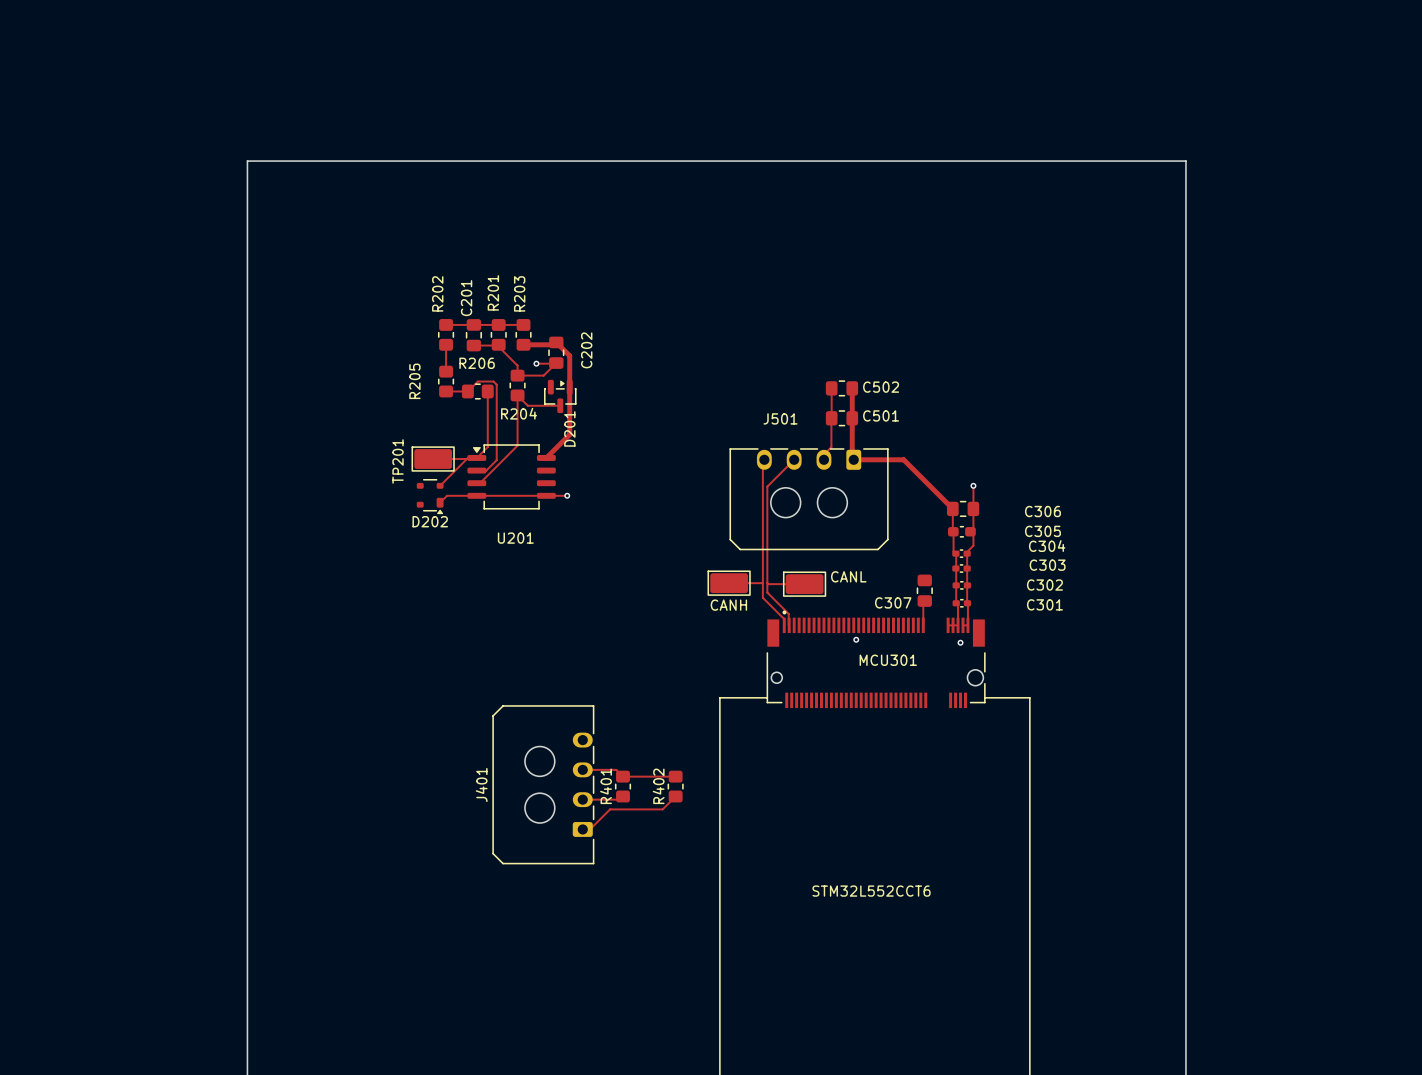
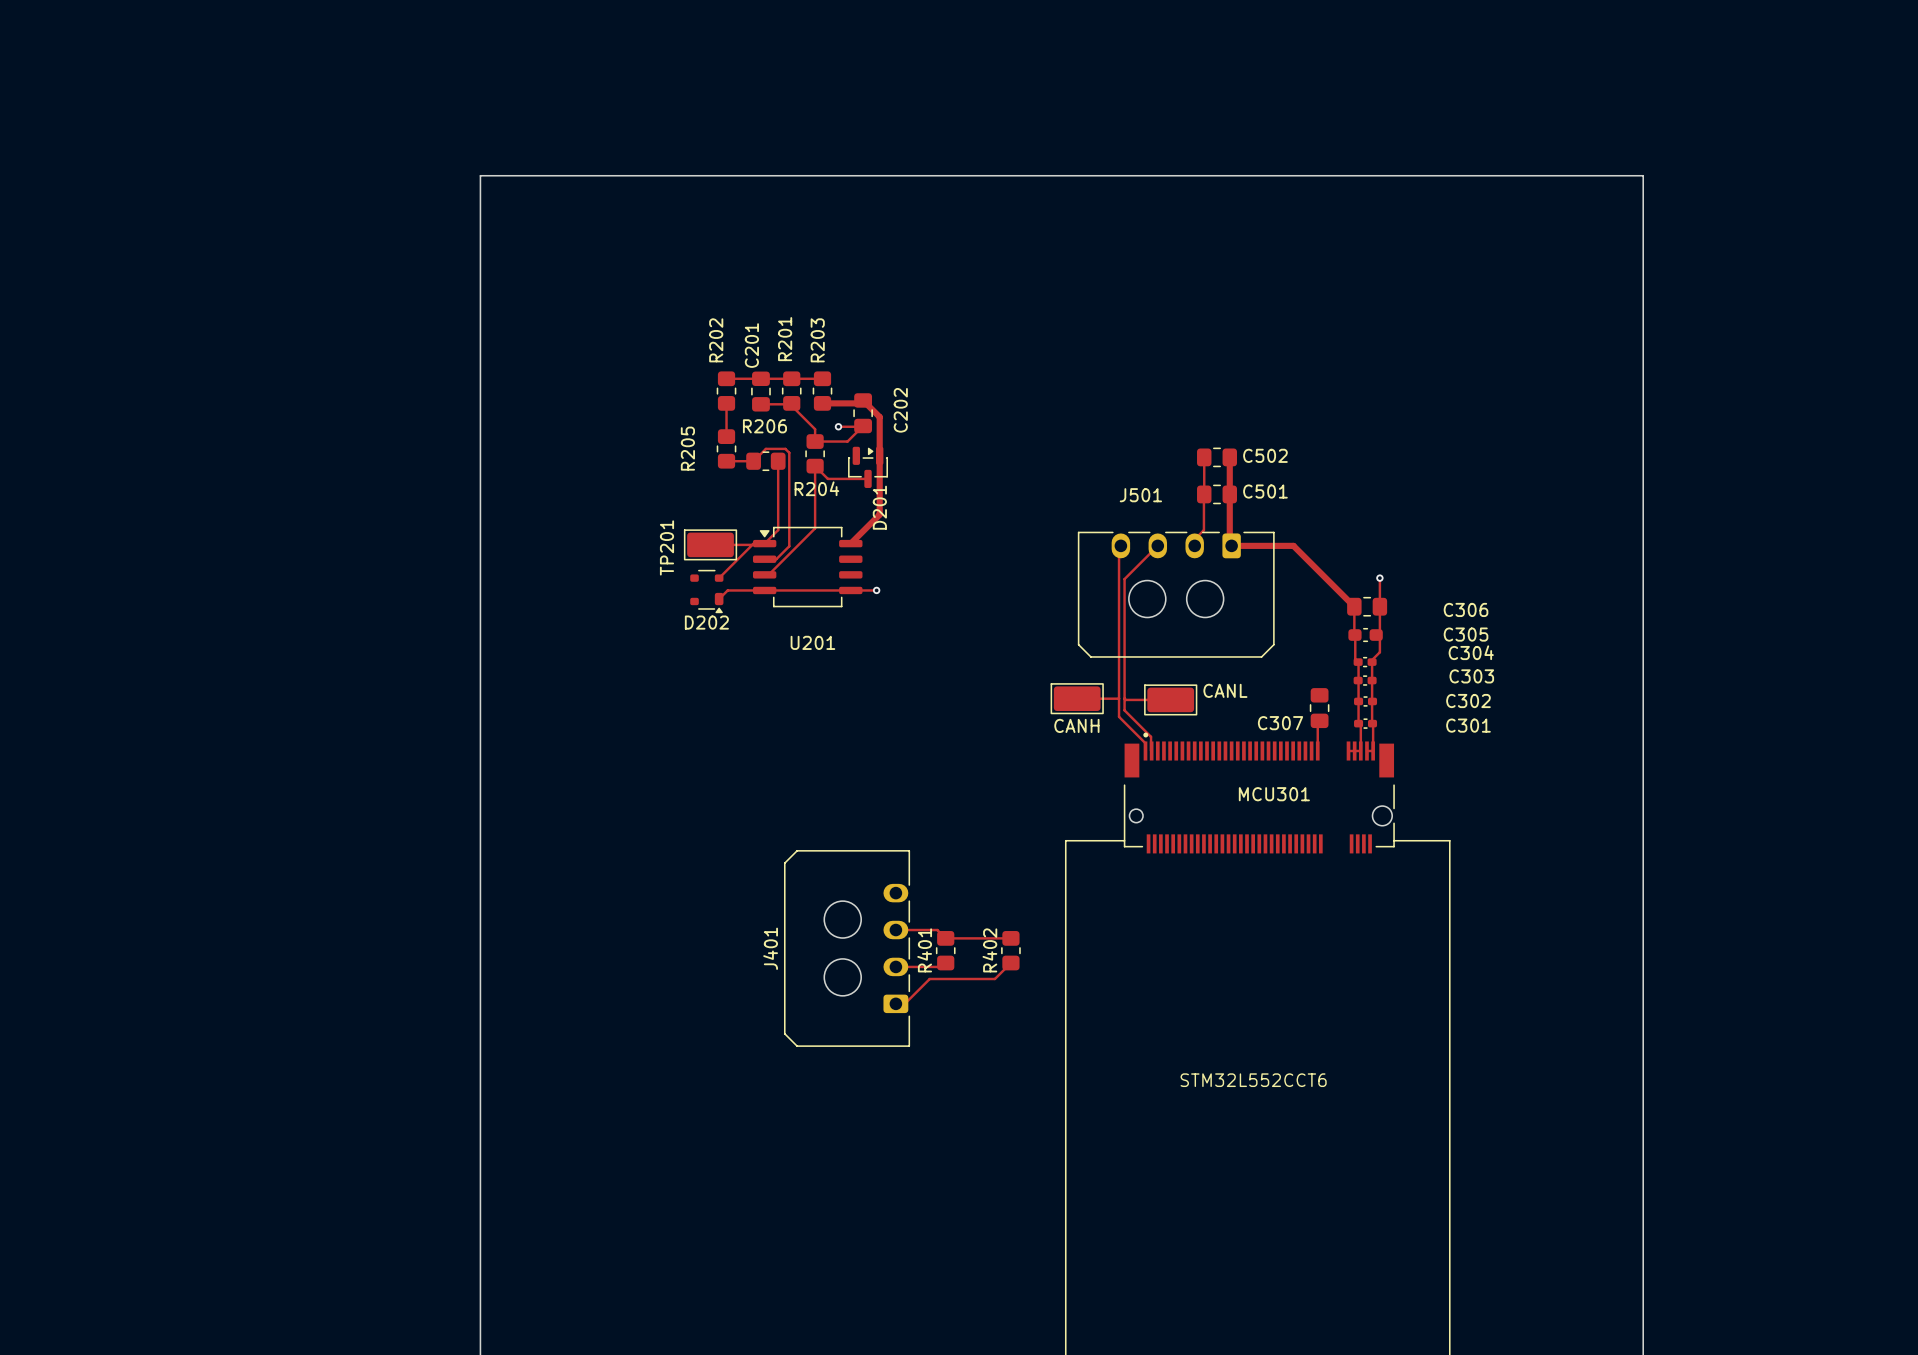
via: (856, 639) -> none
via: (960, 642) -> none

